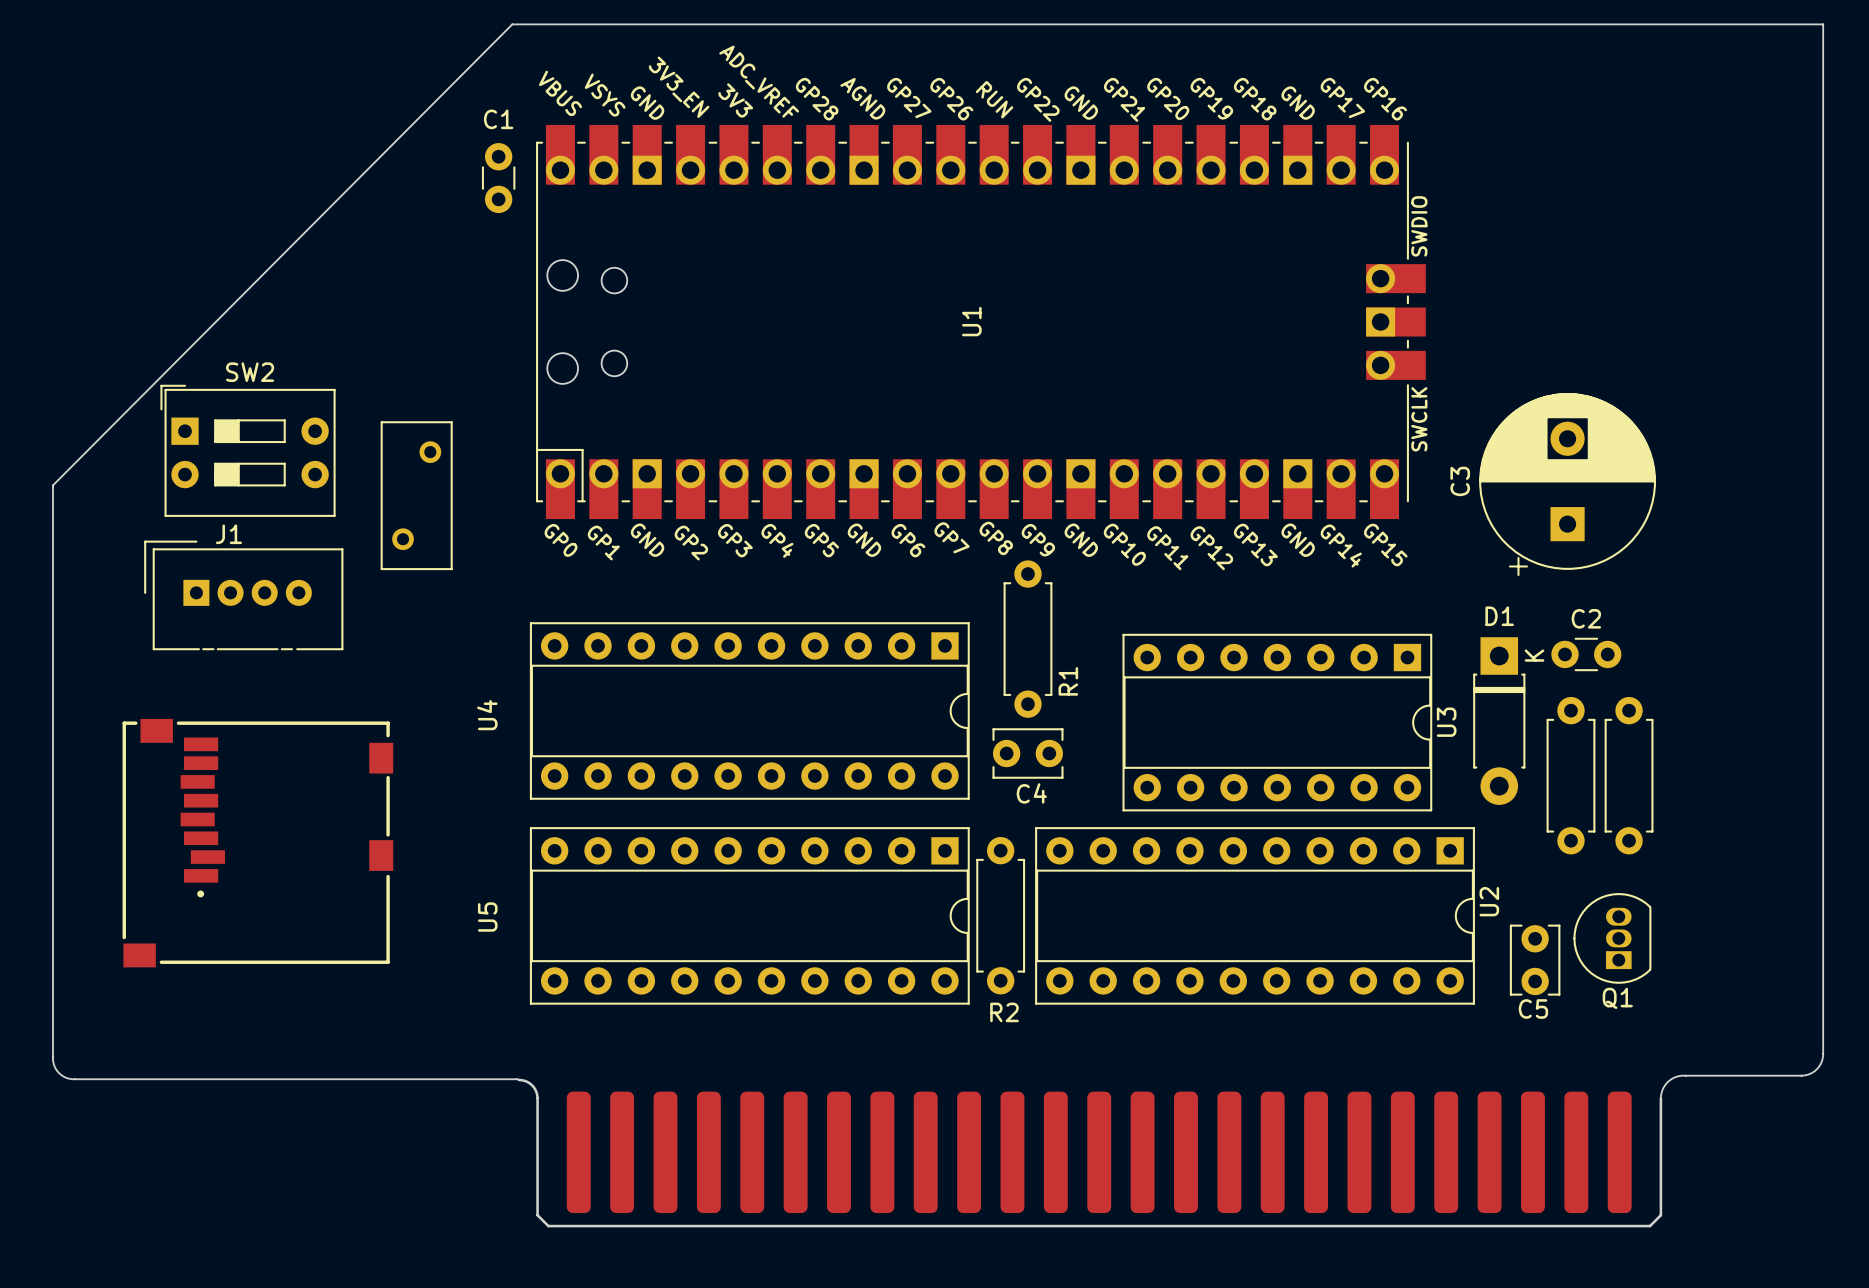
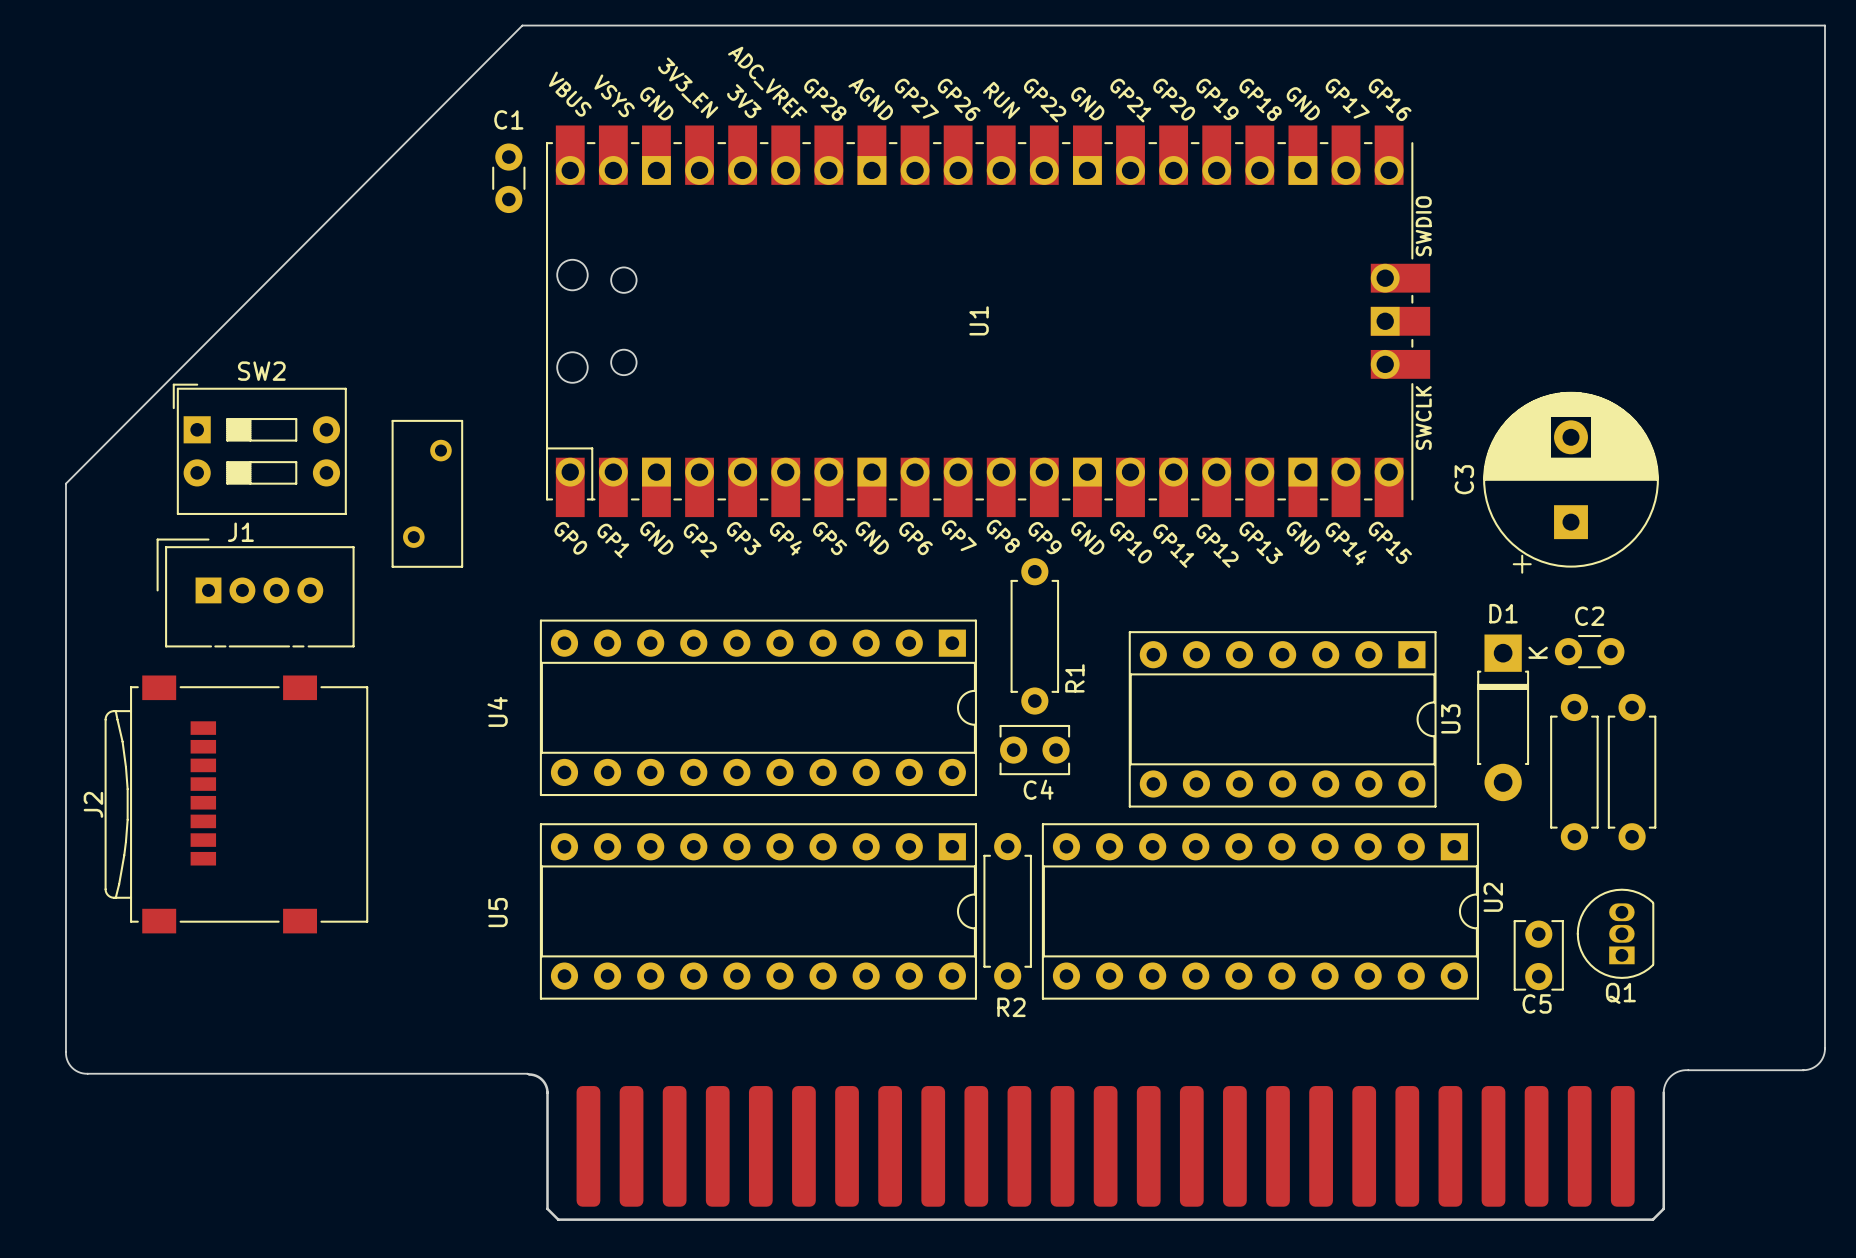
J2: none -> (236, 804)
part: (257, 843) -> none

